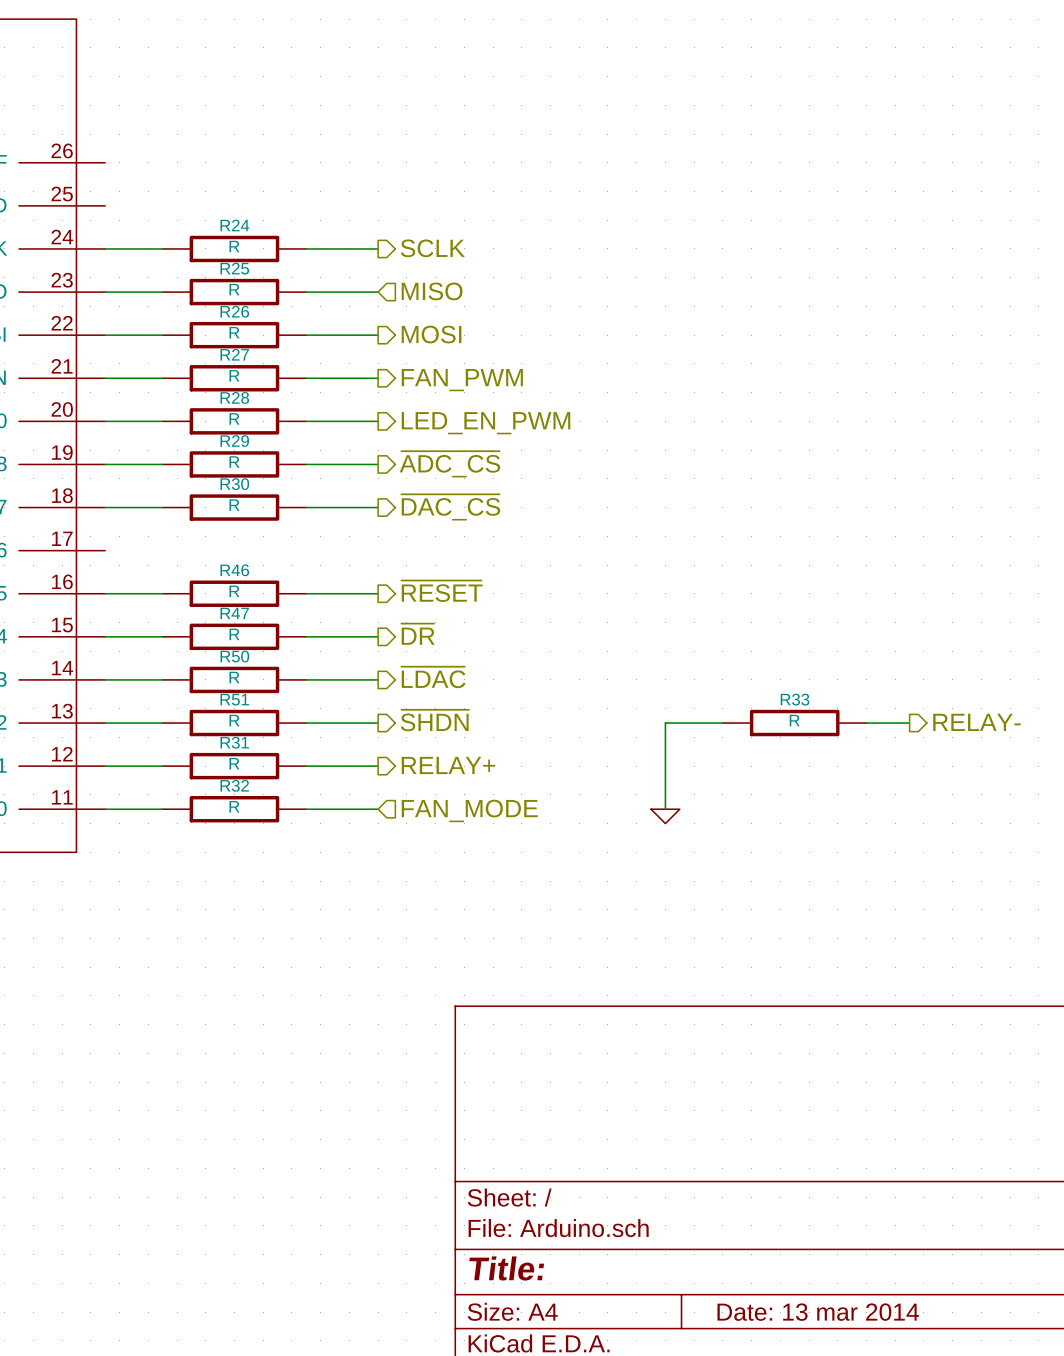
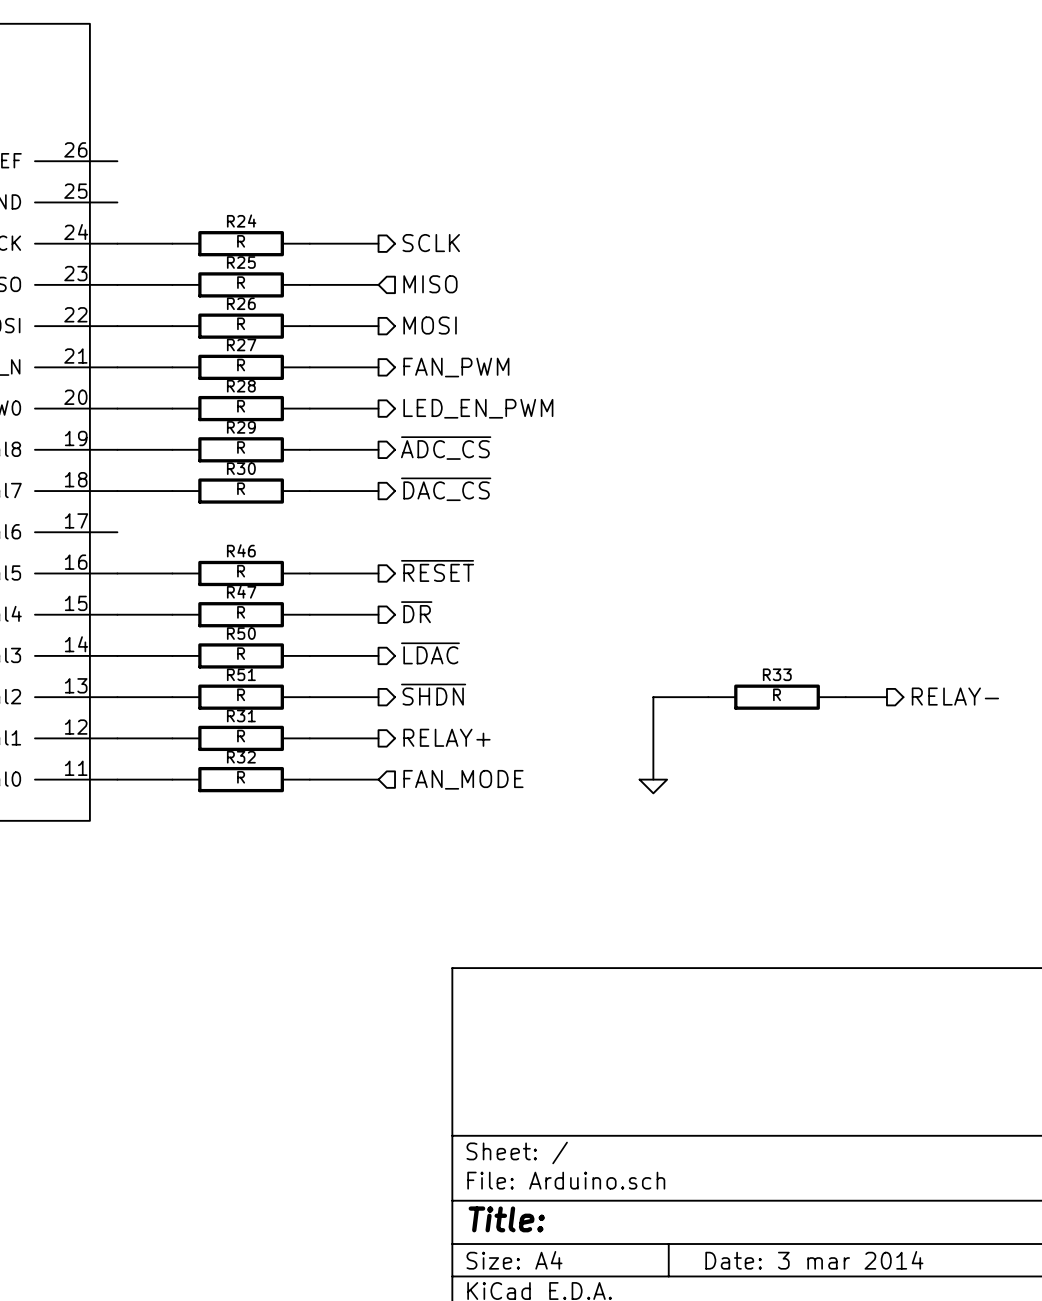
title block: Date: 13 mar 2014 (818, 1312) -> Date: 3 mar 2014 (814, 1260)

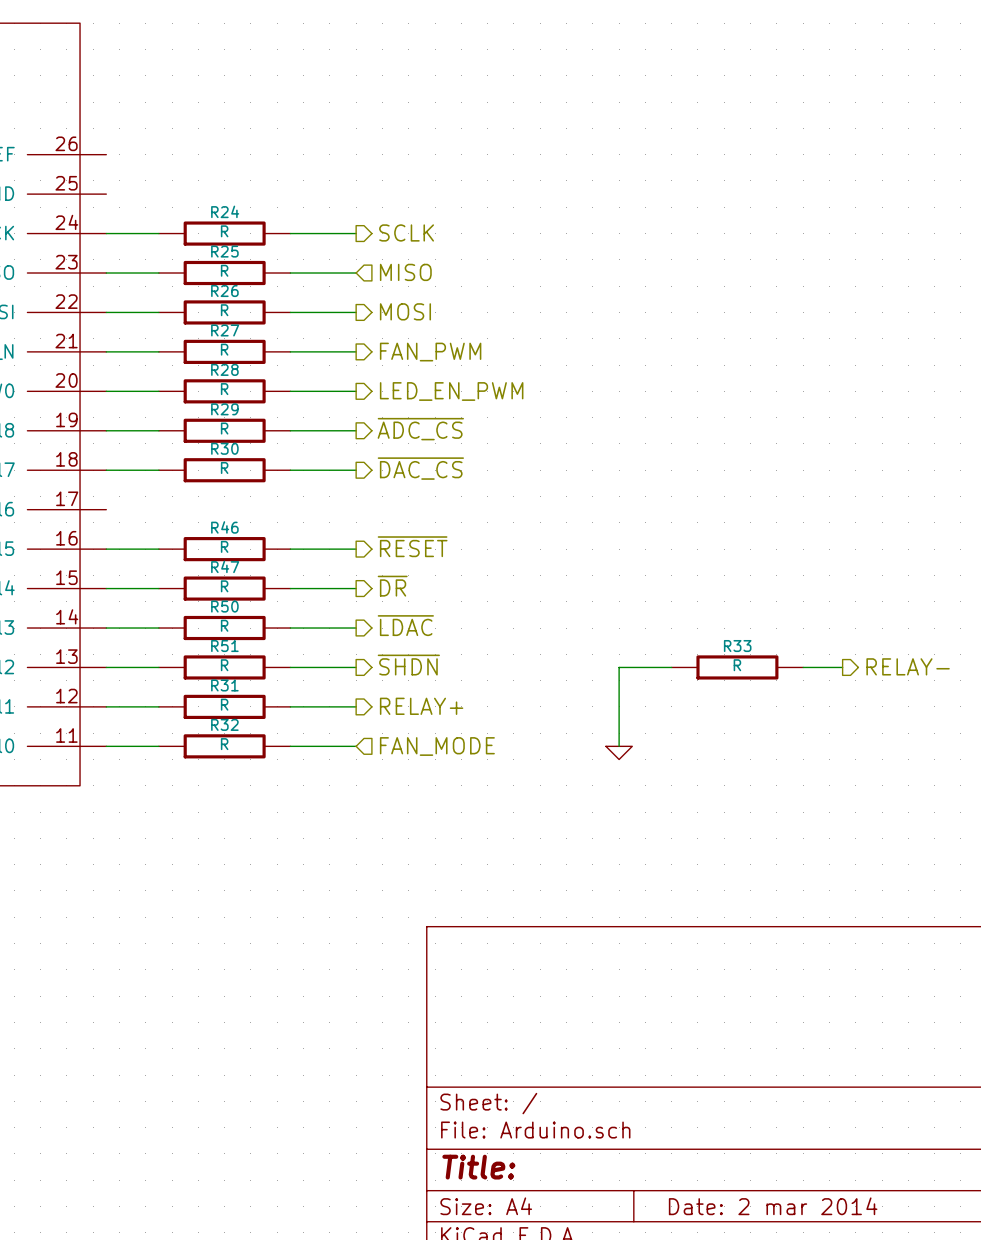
title block: Date: 3 mar 2014 (814, 1260) -> Date: 2 mar 2014 (773, 1206)

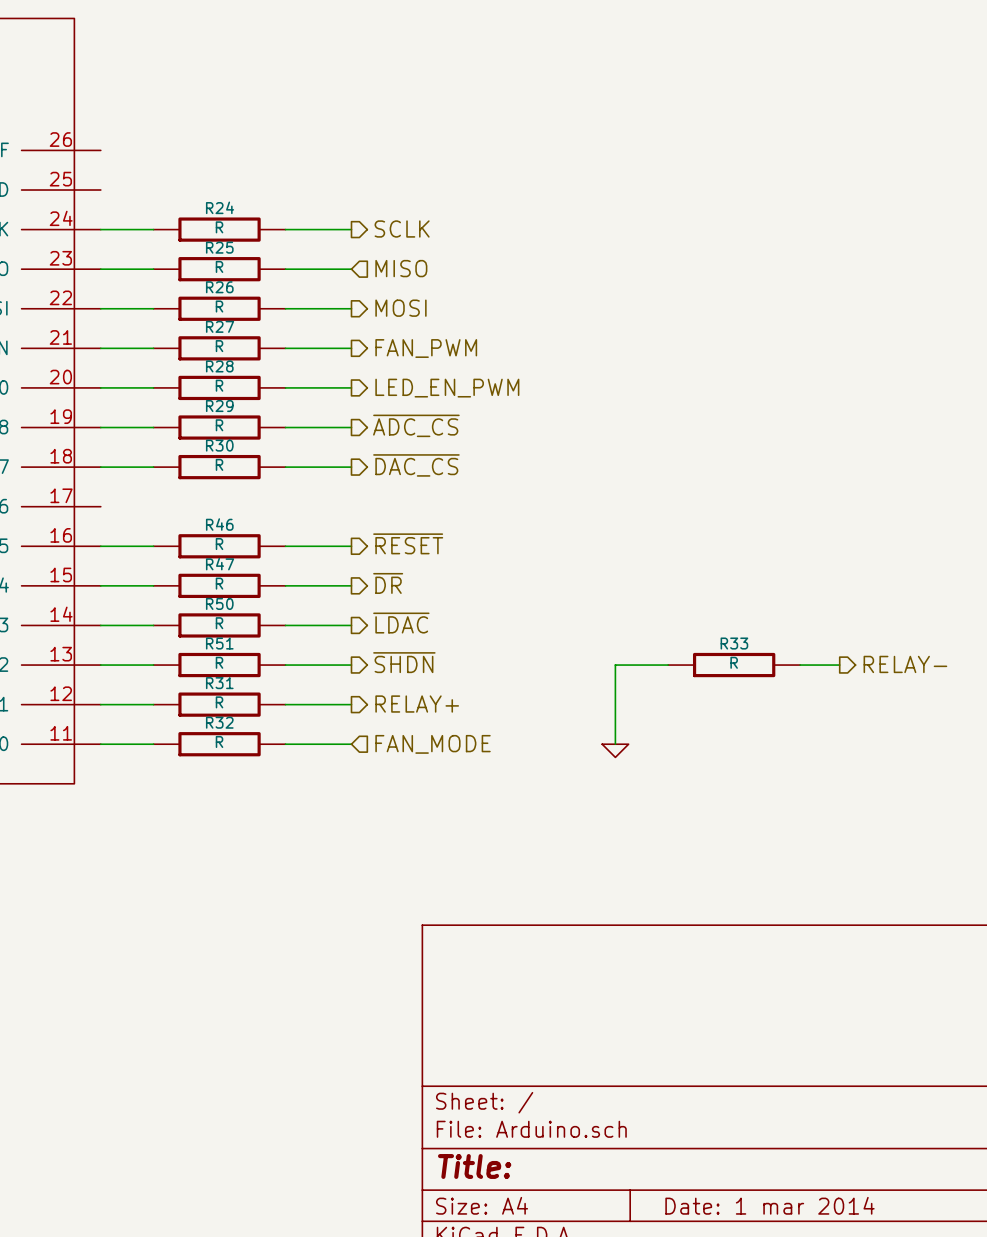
title block: Date: 2 mar 2014 (773, 1206) -> Date: 1 mar 2014 (770, 1205)

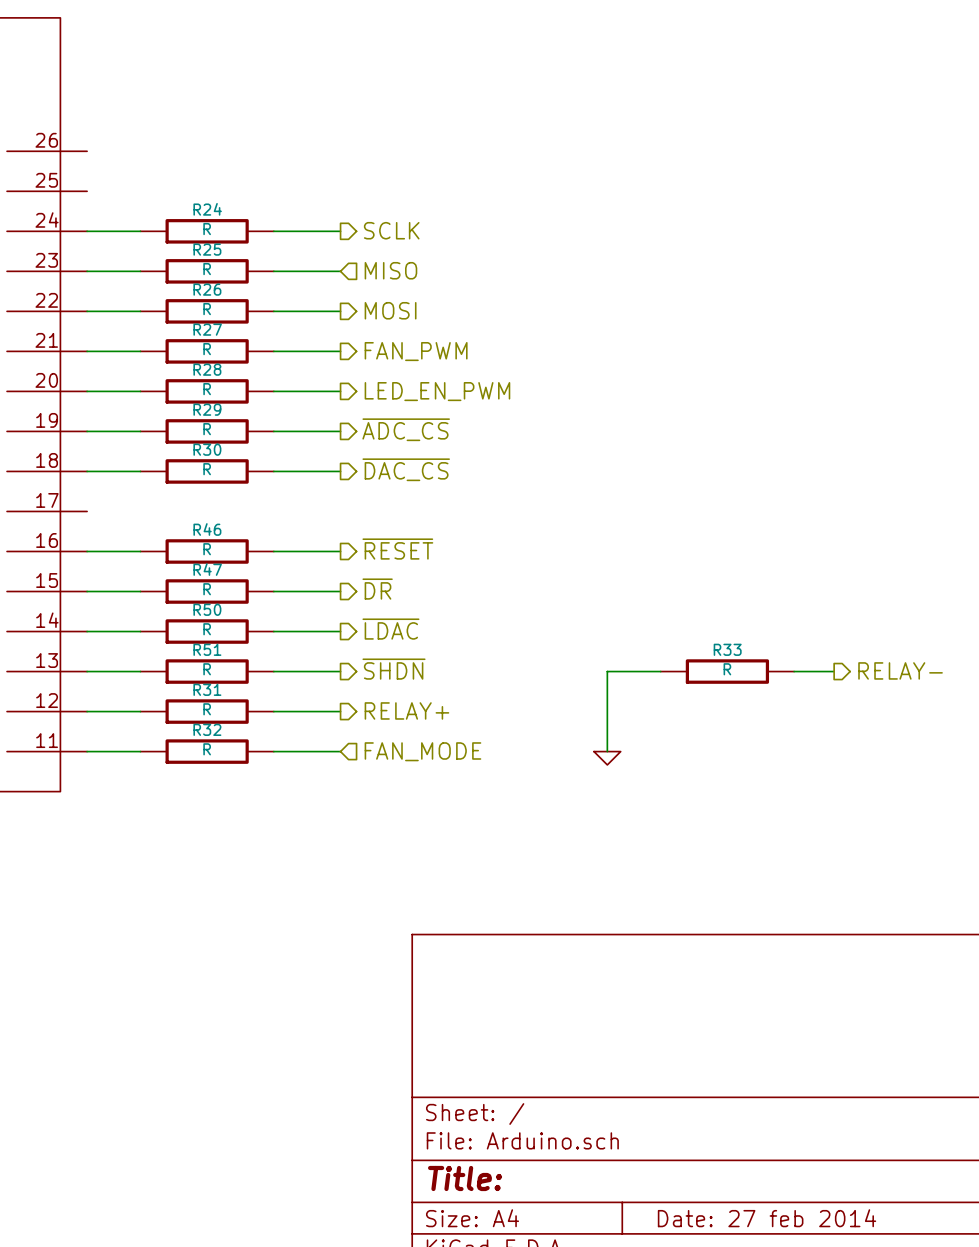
title block: Date: 1 mar 2014 (770, 1205) -> Date: 27 feb 2014 (767, 1218)

